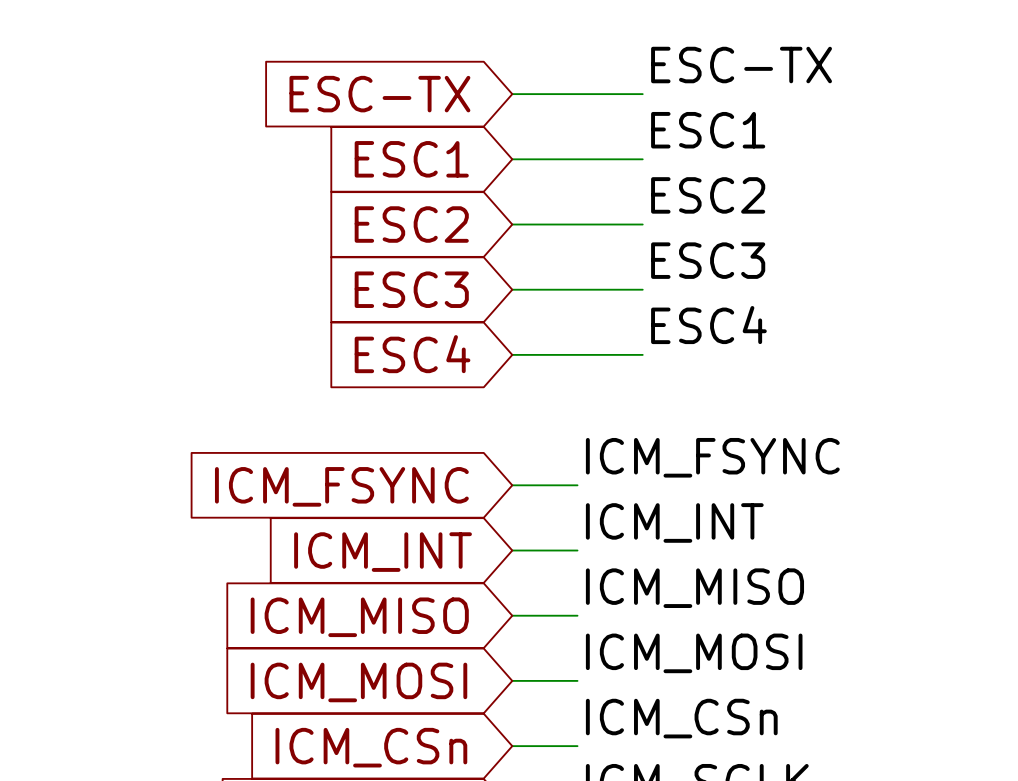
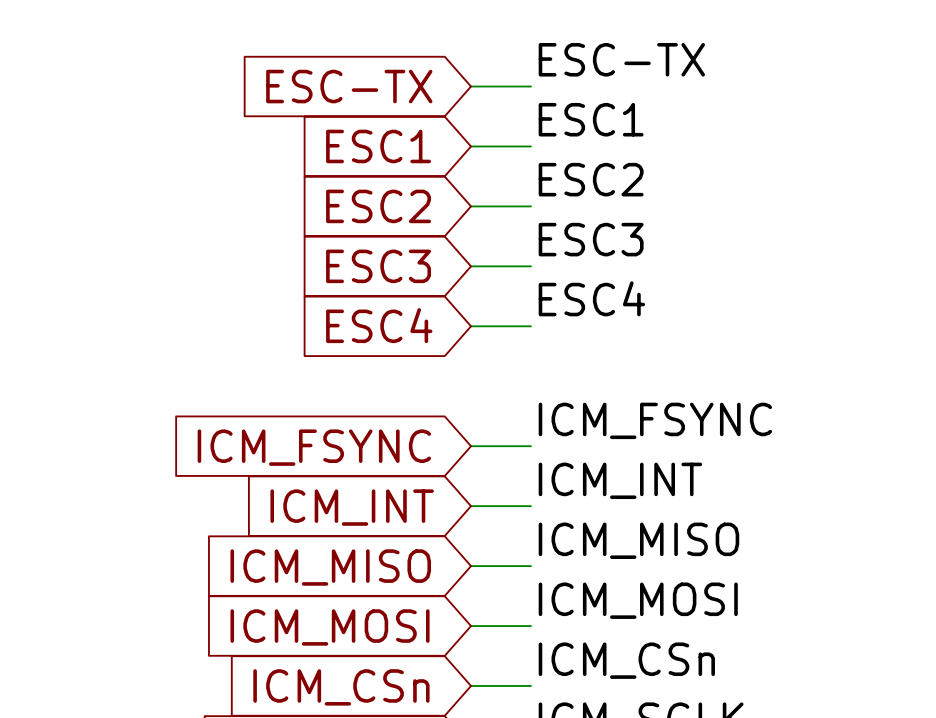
label position: ESC-TX (741, 65) -> ESC-TX (621, 59)
wire: (577, 94) (642, 94) -> none
label position: ESC1 (708, 130) -> ESC1 (591, 119)
wire: (577, 159) (642, 159) -> none
label position: ESC2 (708, 195) -> ESC2 (591, 179)
wire: (577, 224) (642, 224) -> none
label position: ESC3 (708, 260) -> ESC3 (591, 239)
wire: (577, 289) (642, 289) -> none
label position: ESC4 (708, 325) -> ESC4 (591, 298)
wire: (577, 354) (642, 354) -> none

